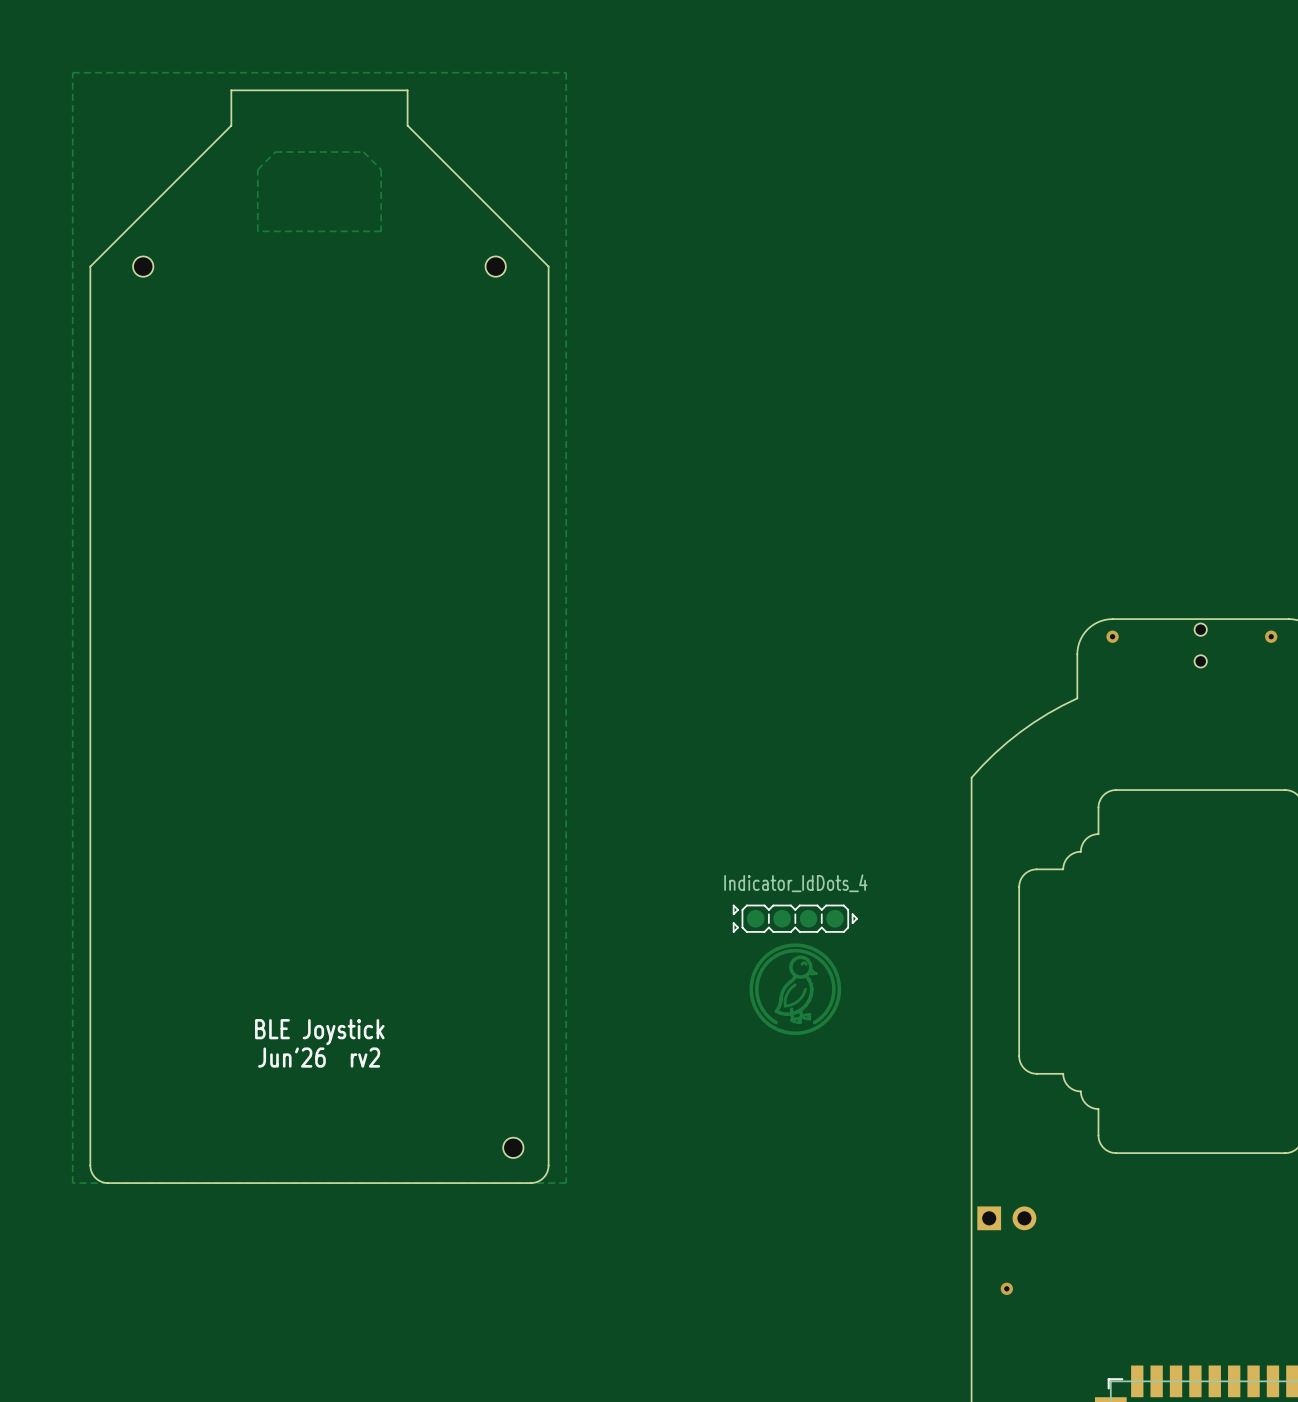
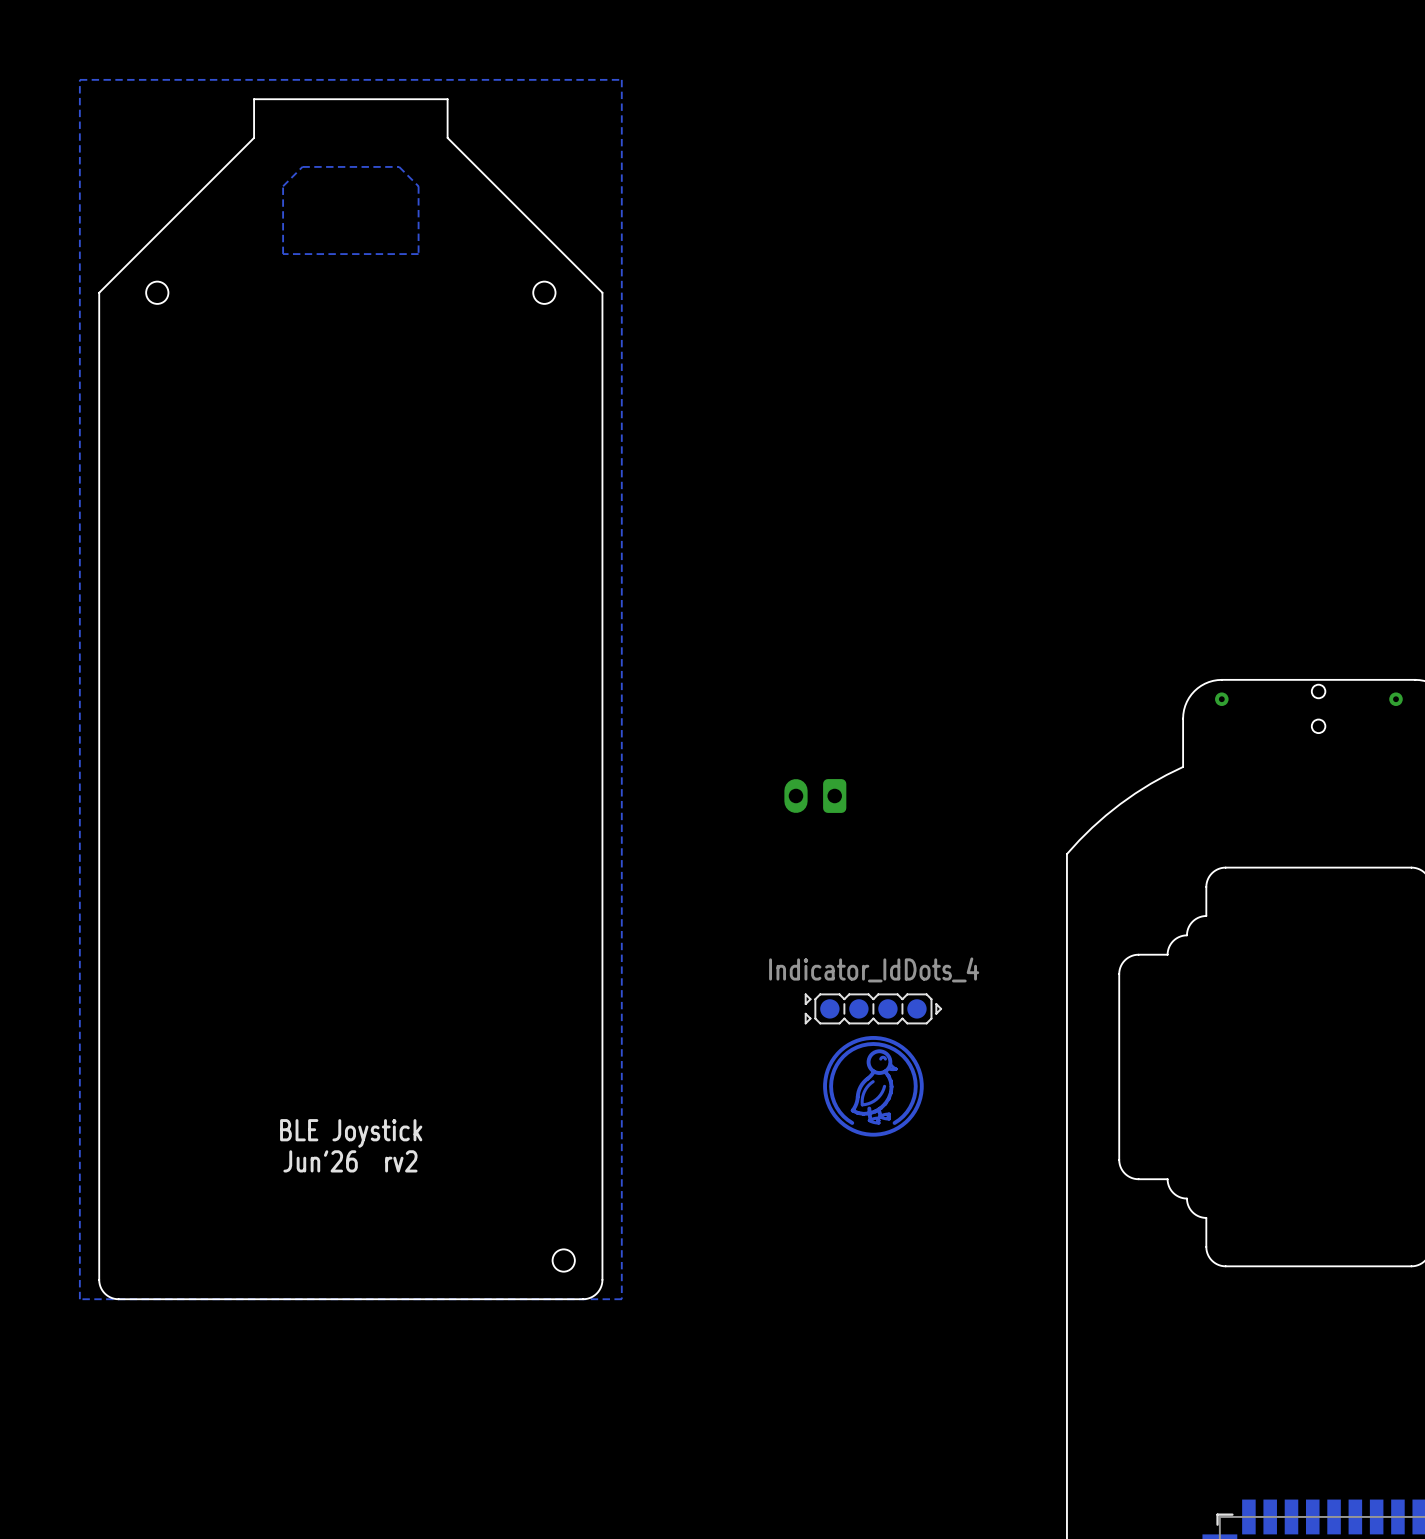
part: none -> (815, 796)
drawing shape: [724, 874, 868, 933] -> [769, 957, 980, 1025]
part: (1006, 1218) -> none
via: (1006, 1288) -> none

